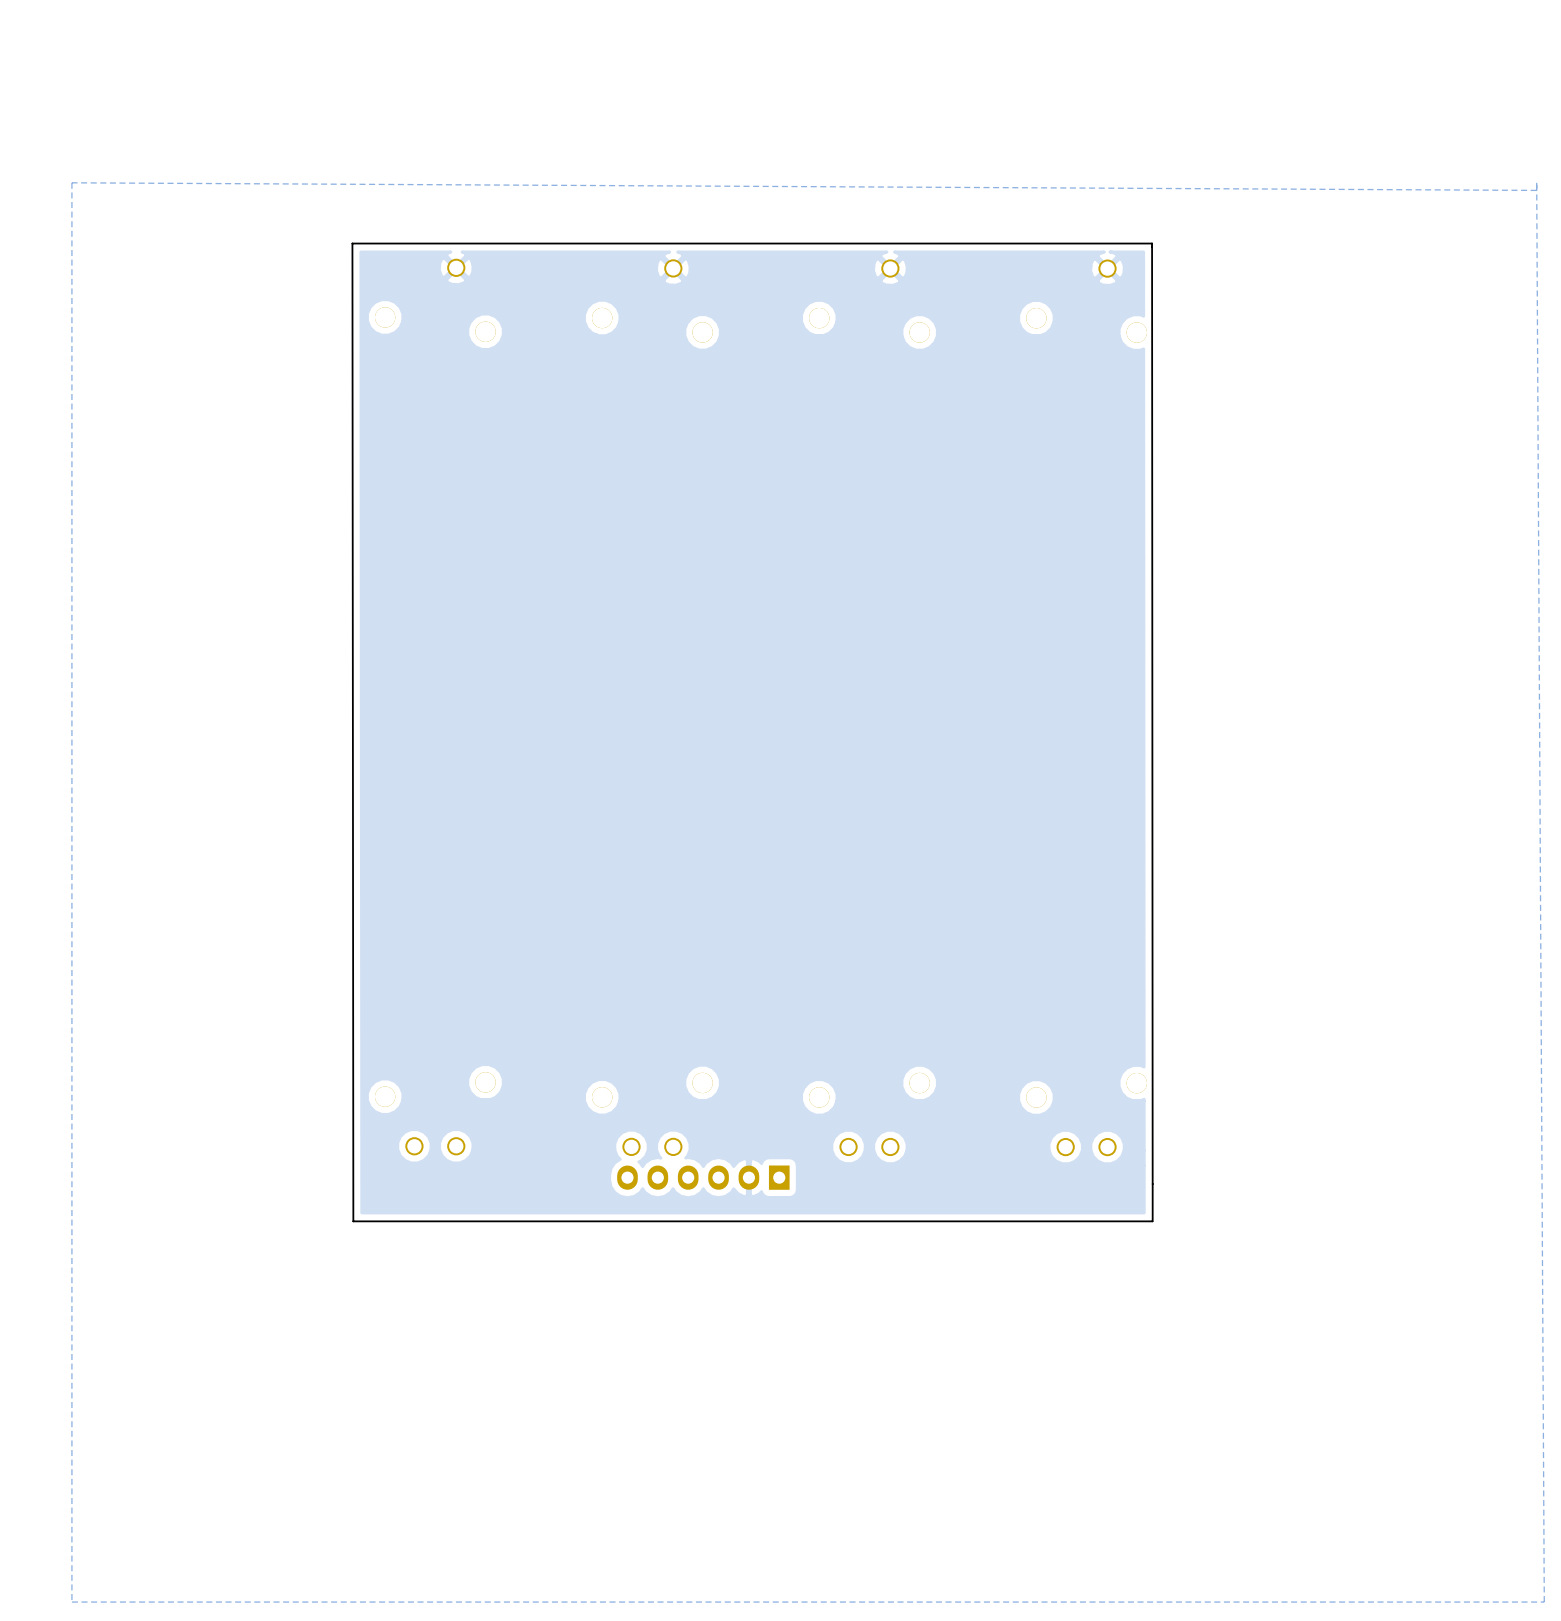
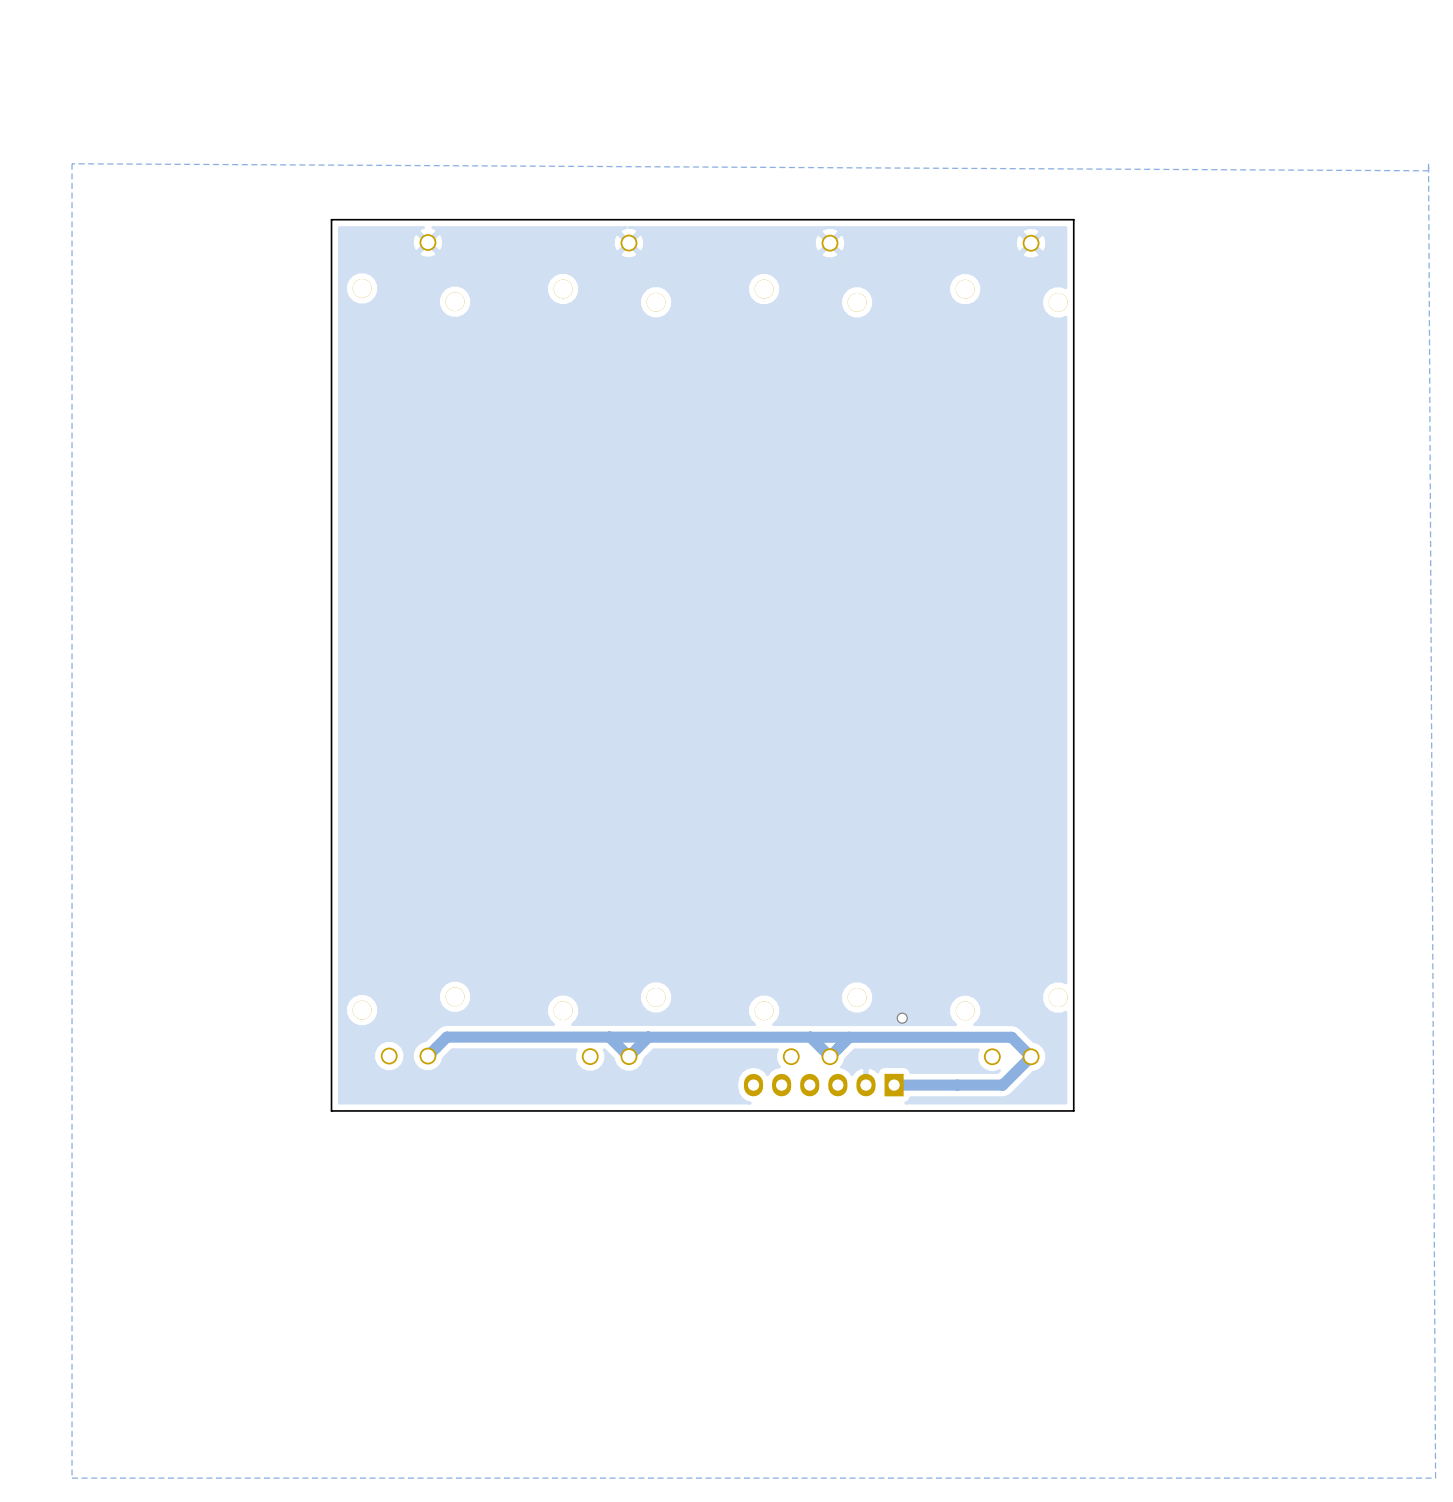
board edge: none -> (1073, 219) (331, 219) (331, 1110) (1073, 1110) (1073, 219)
via: none -> (902, 1018)
track: none -> (609, 1037) (628, 1056) (648, 1037) (810, 1037) (829, 1056) (849, 1037)
track: none -> (648, 1037) (446, 1037) (427, 1056)
track: none -> (810, 1037) (1011, 1037) (1031, 1056) (1002, 1085) (894, 1085)
part position: (703, 1177) -> (823, 1085)
board edge: (1152, 1221) (1152, 243) (352, 243) (353, 1221) (1152, 1221) -> none

